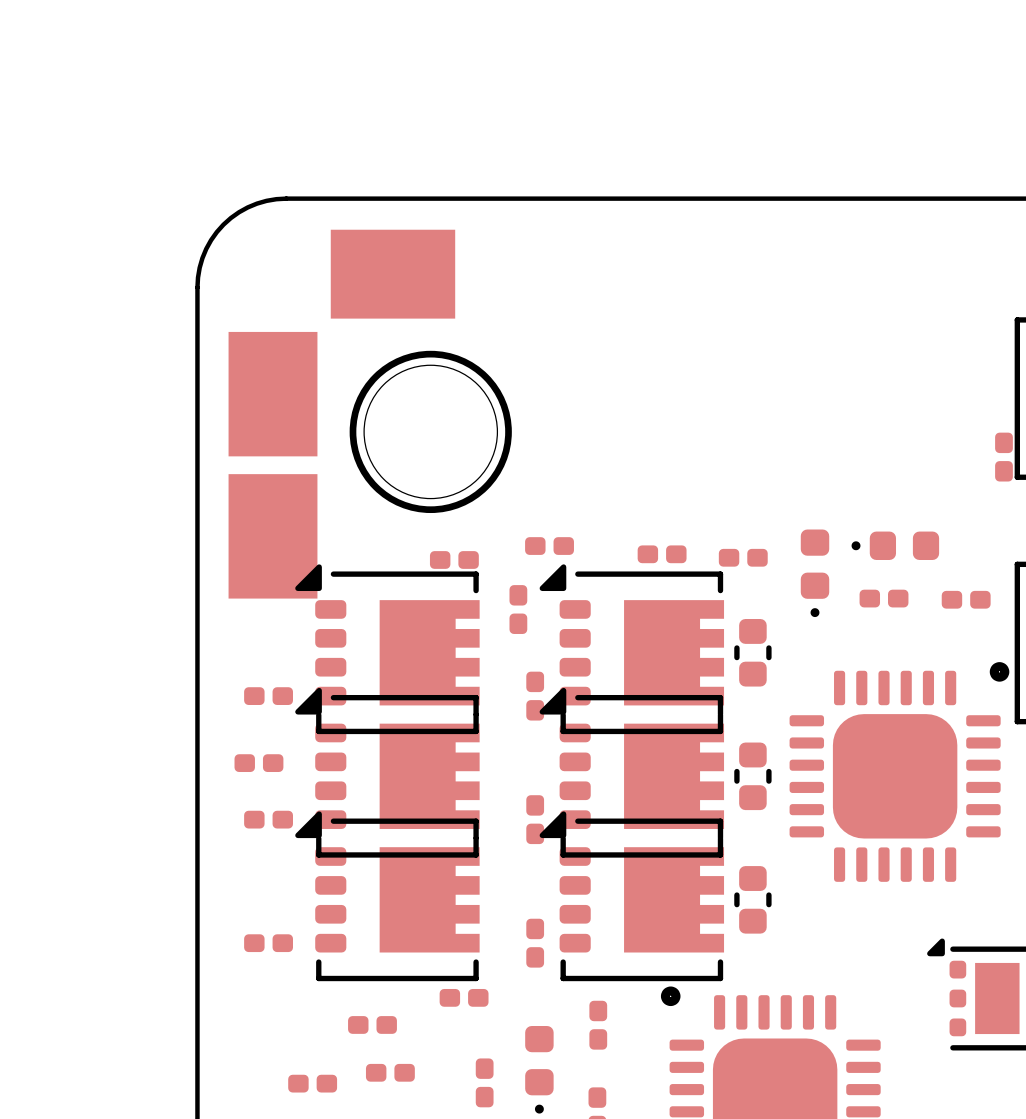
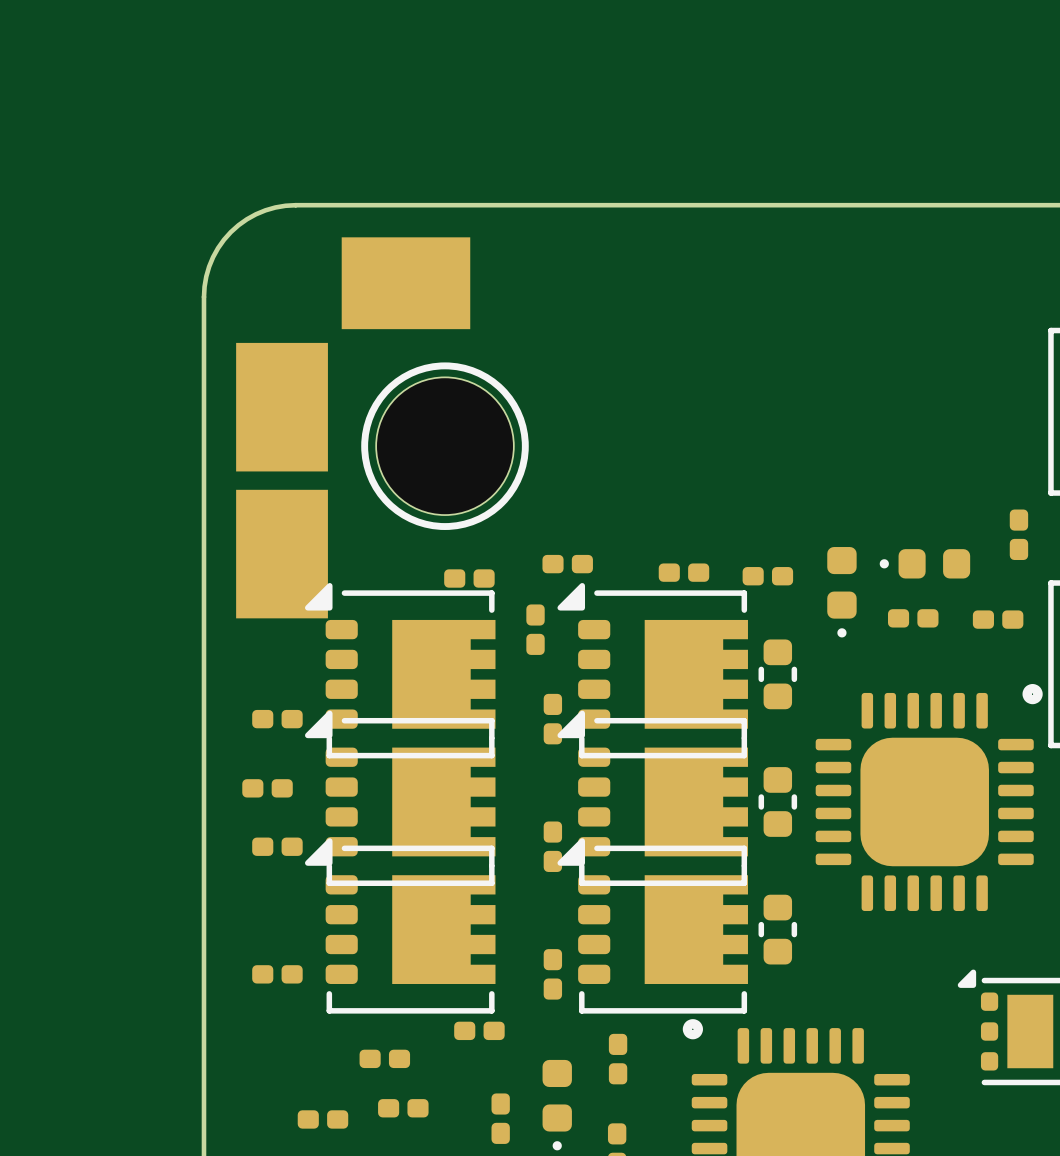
part position: (1003, 457) -> (1018, 534)

